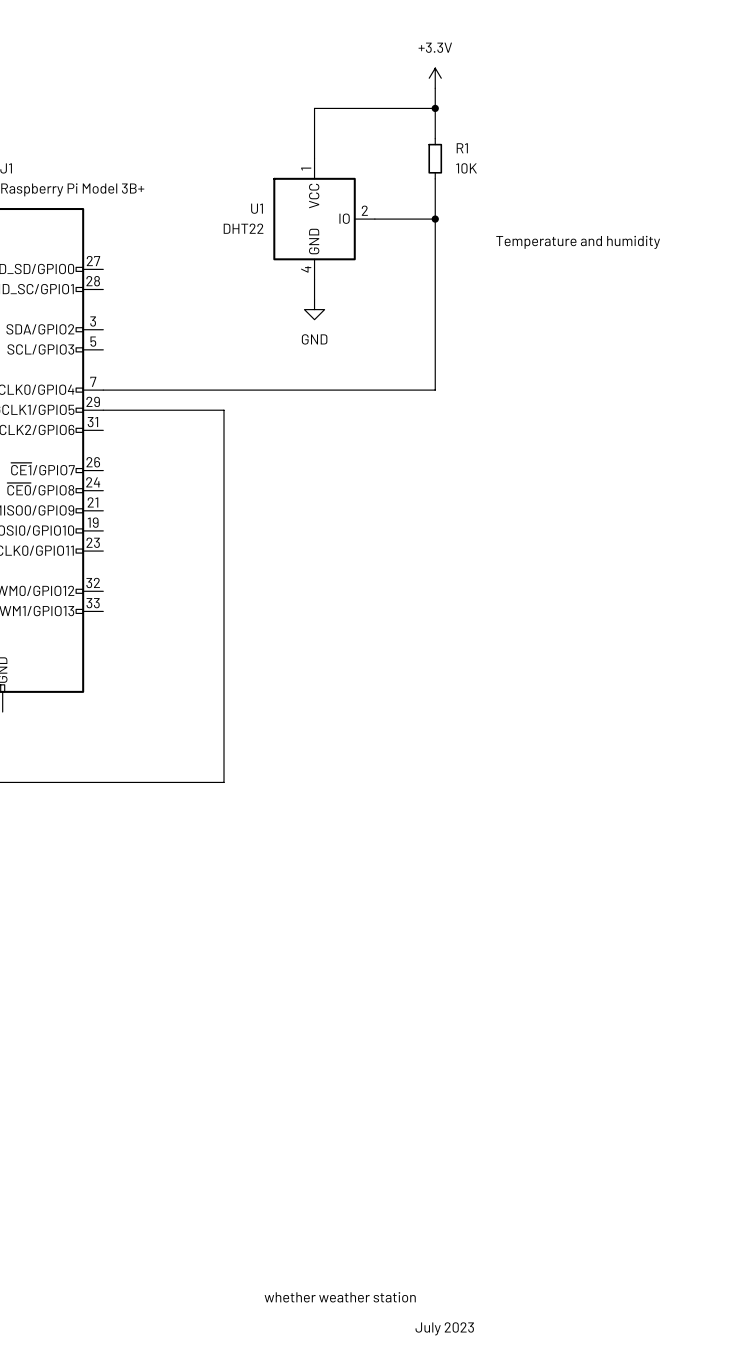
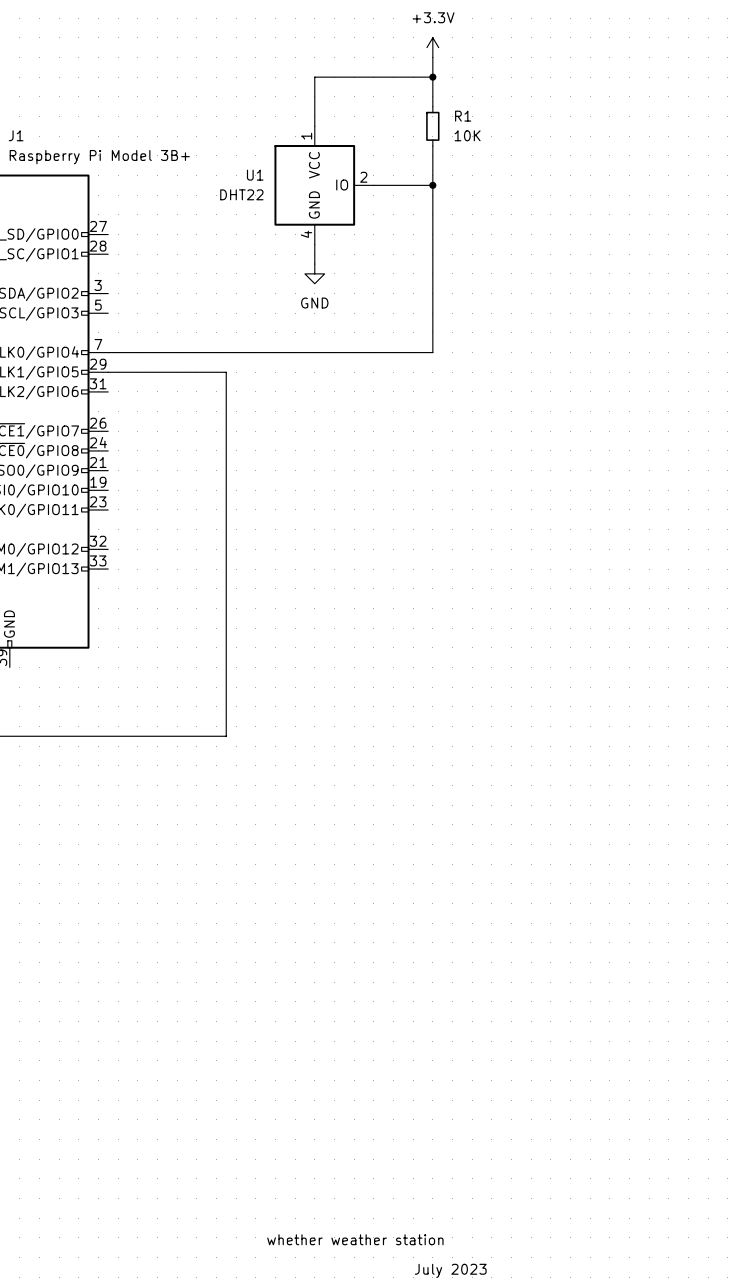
text: Temperature and humidity (578, 242) -> none

